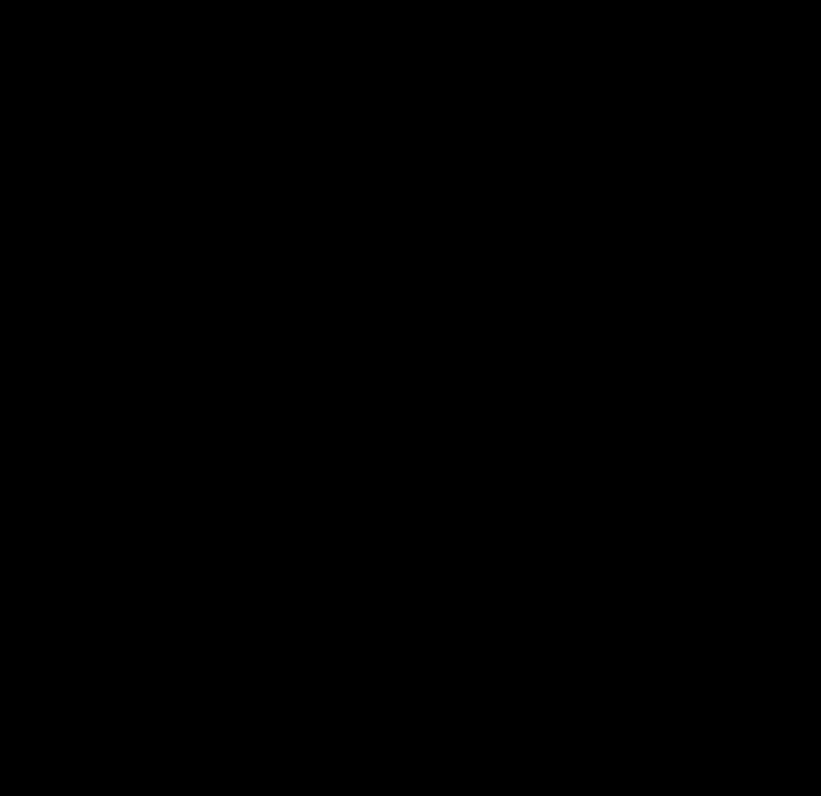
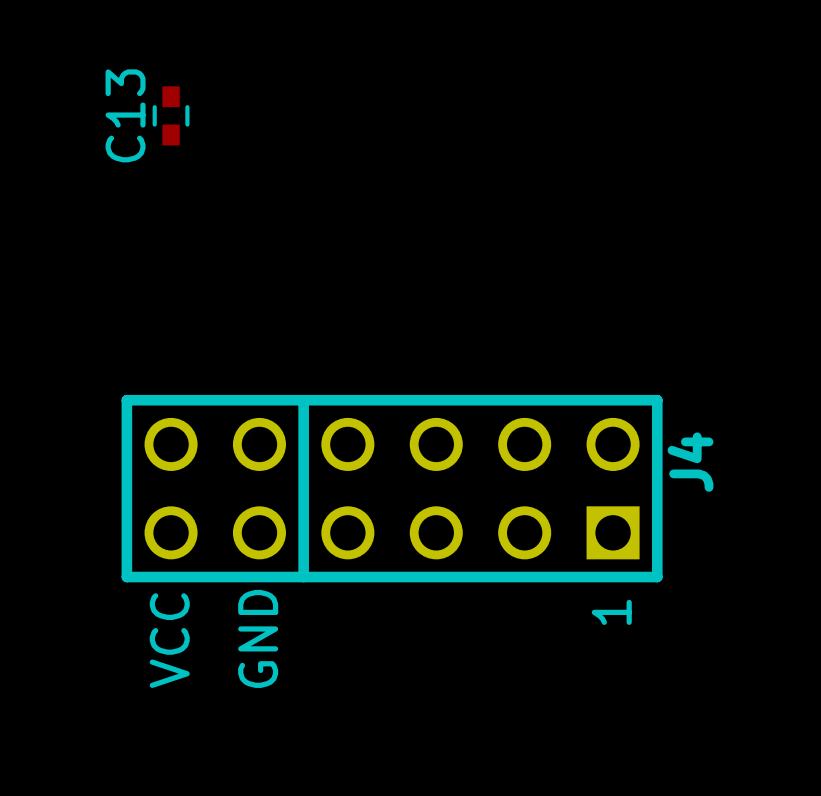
C13: none -> (171, 115)
J4: none -> (392, 488)

